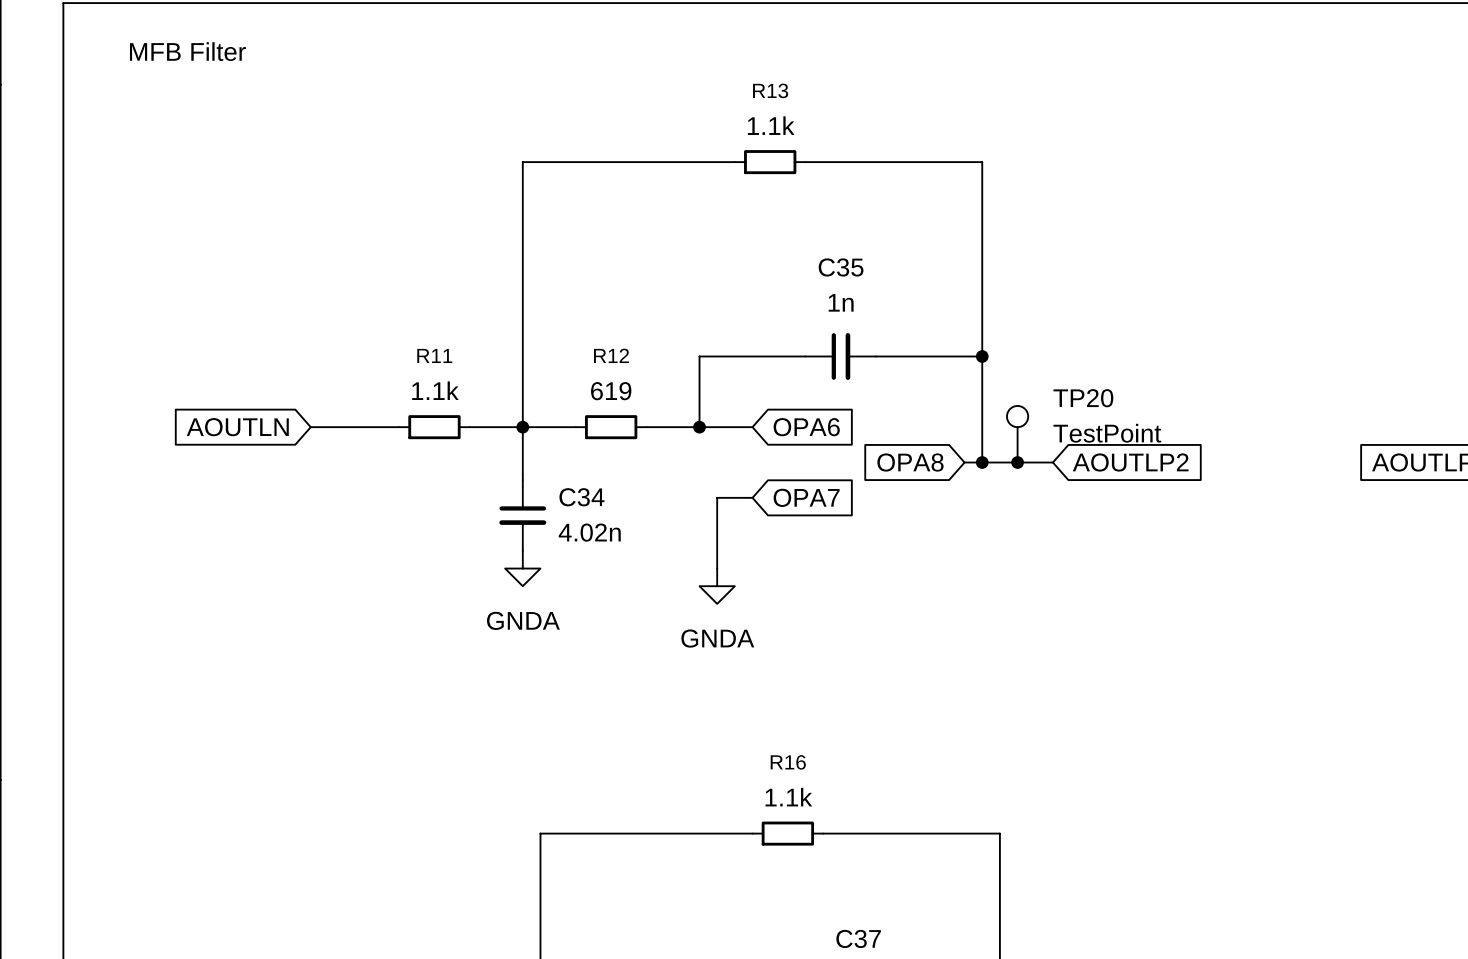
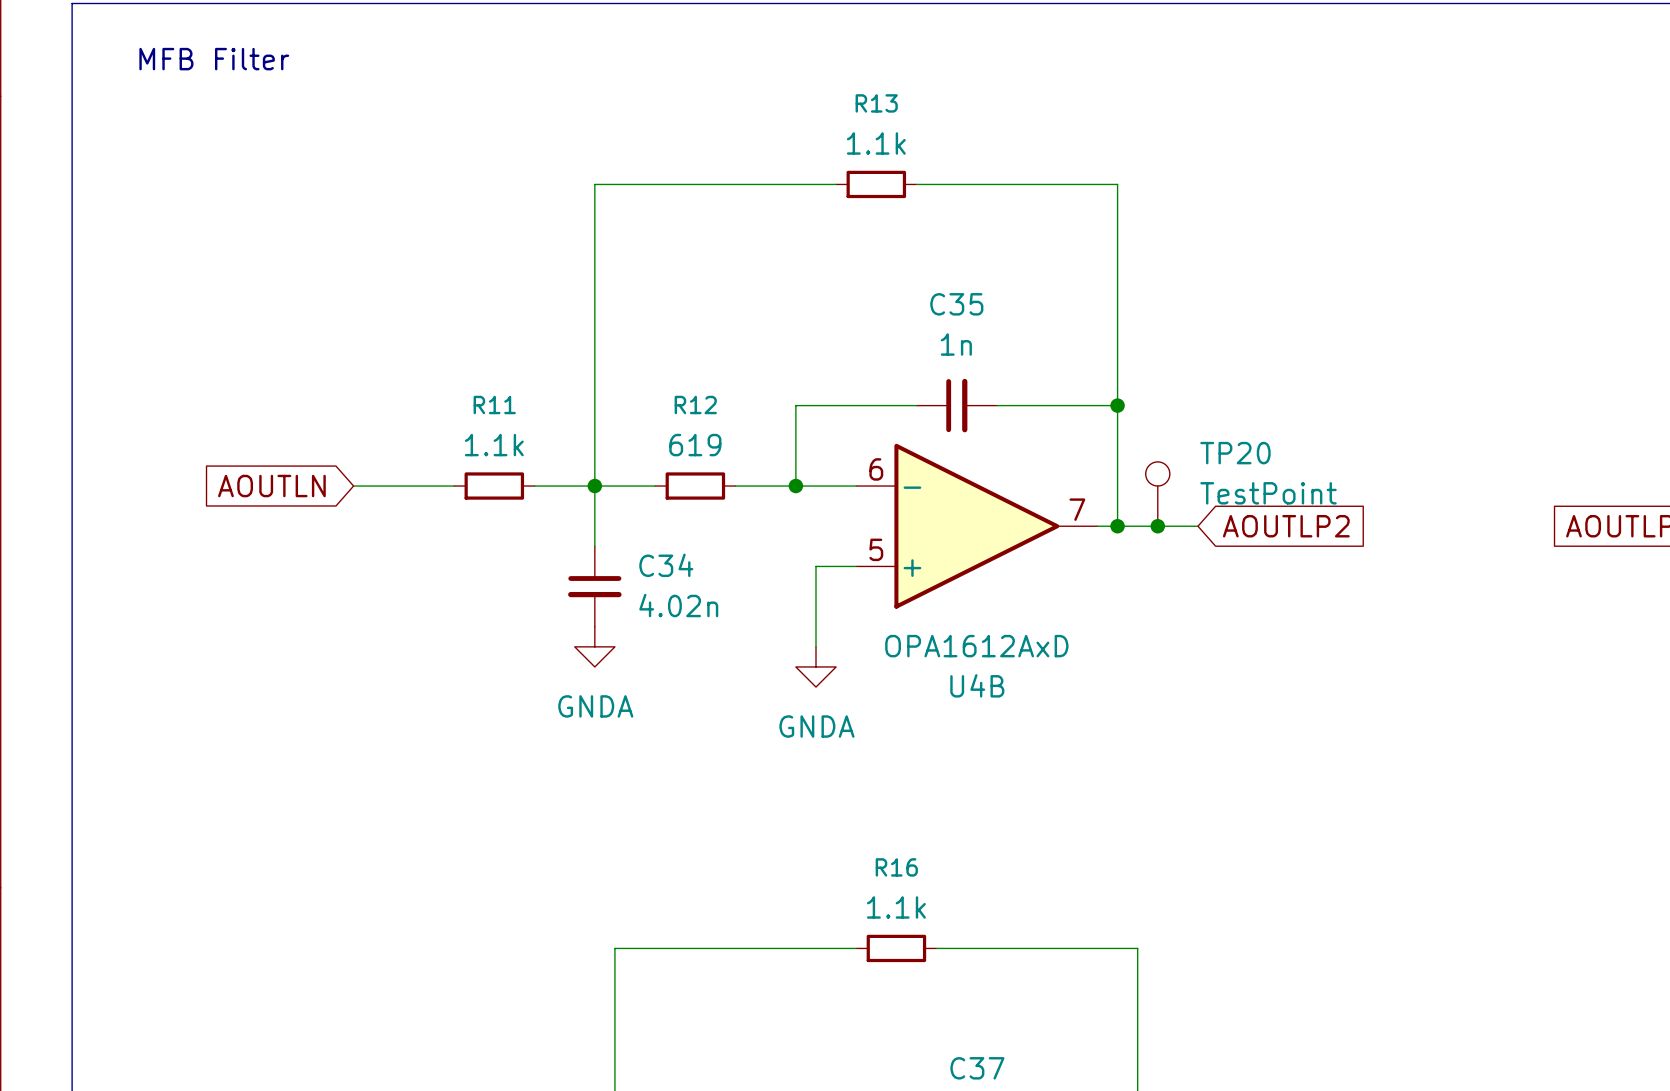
global label: OPA6 (806, 427) -> none
U4B: none -> OPA1612AxD (976, 526)
global label: OPA8 (910, 462) -> none
global label: OPA7 (806, 497) -> none

